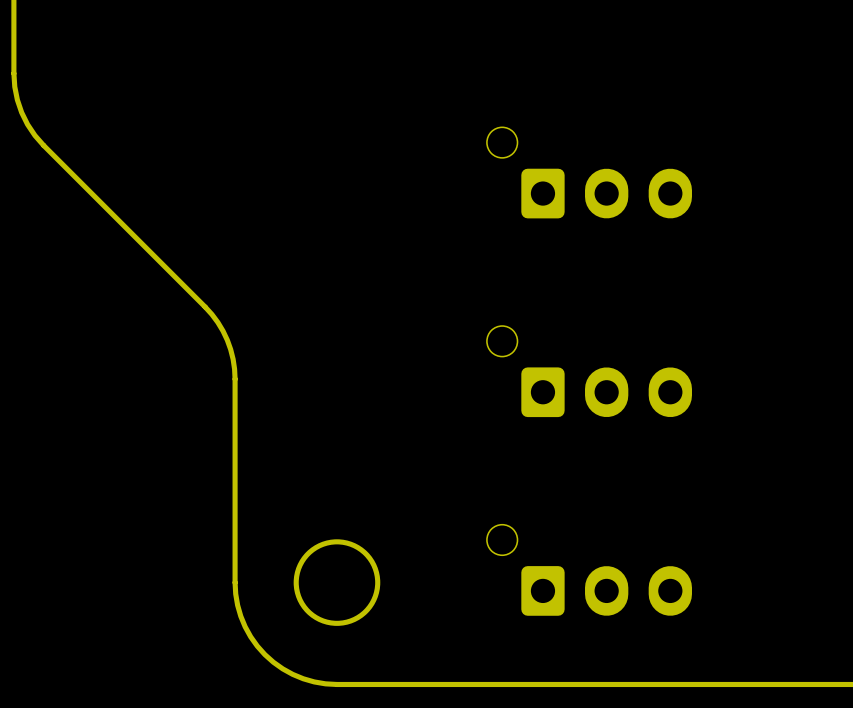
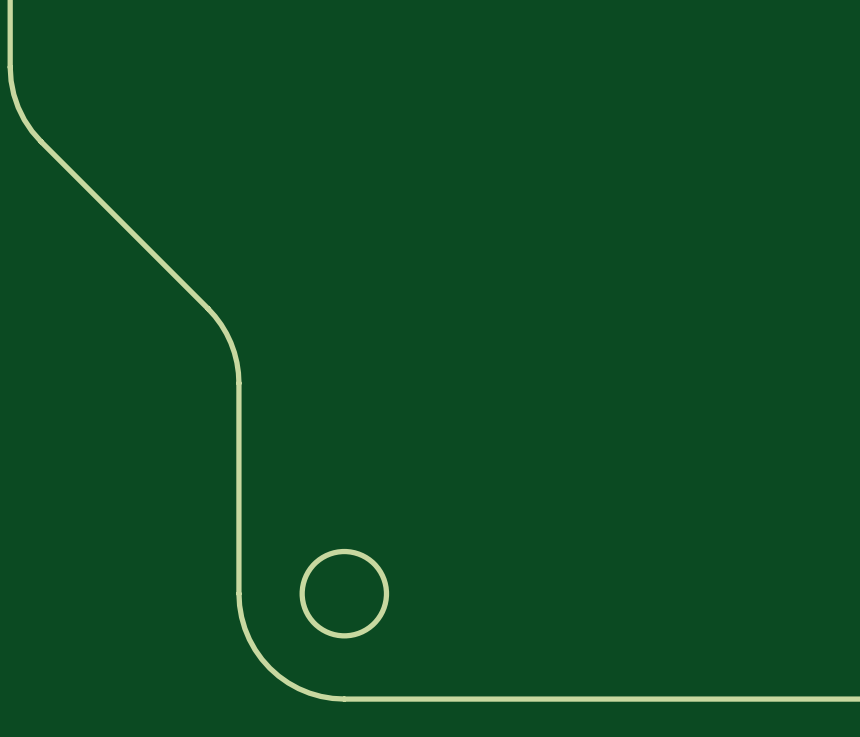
part: (589, 172) -> none
part: (589, 371) -> none
part: (589, 570) -> none

